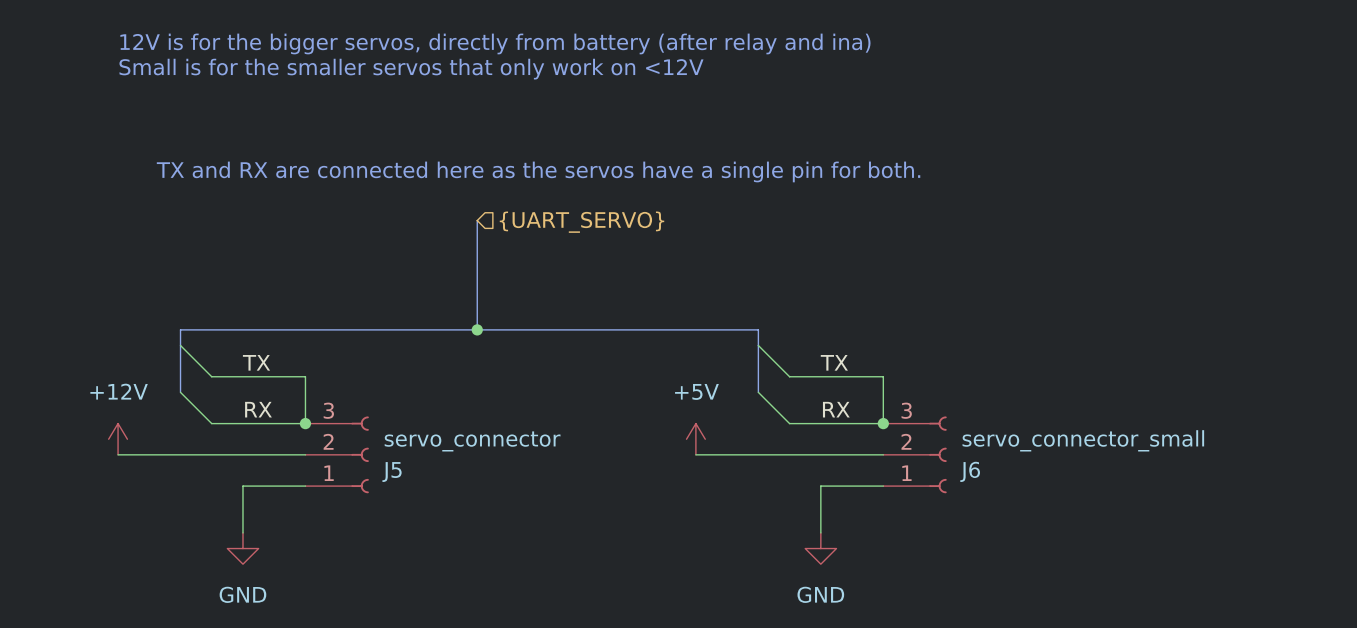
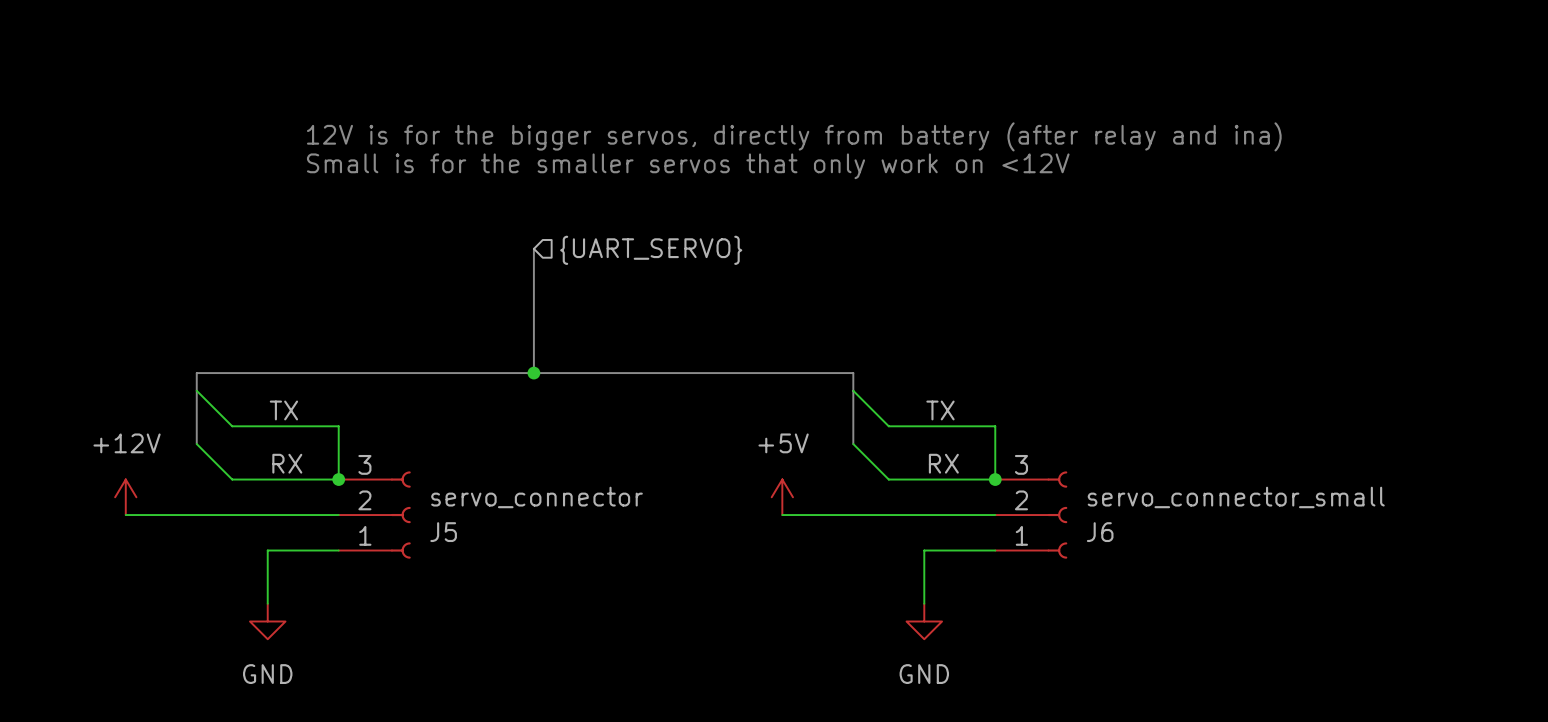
text position: 12V is for the bigger servos, directly from battery (after relay and ina) (495, 43) -> 12V is for the bigger servos, directly from battery (after relay and ina) (794, 136)
text position: Small is for the smaller servos that only work on <12V (411, 69) -> Small is for the smaller servos that only work on <12V (688, 166)
text: TX and RX are connected here as the servos have a single pin for both. (538, 171) -> none

